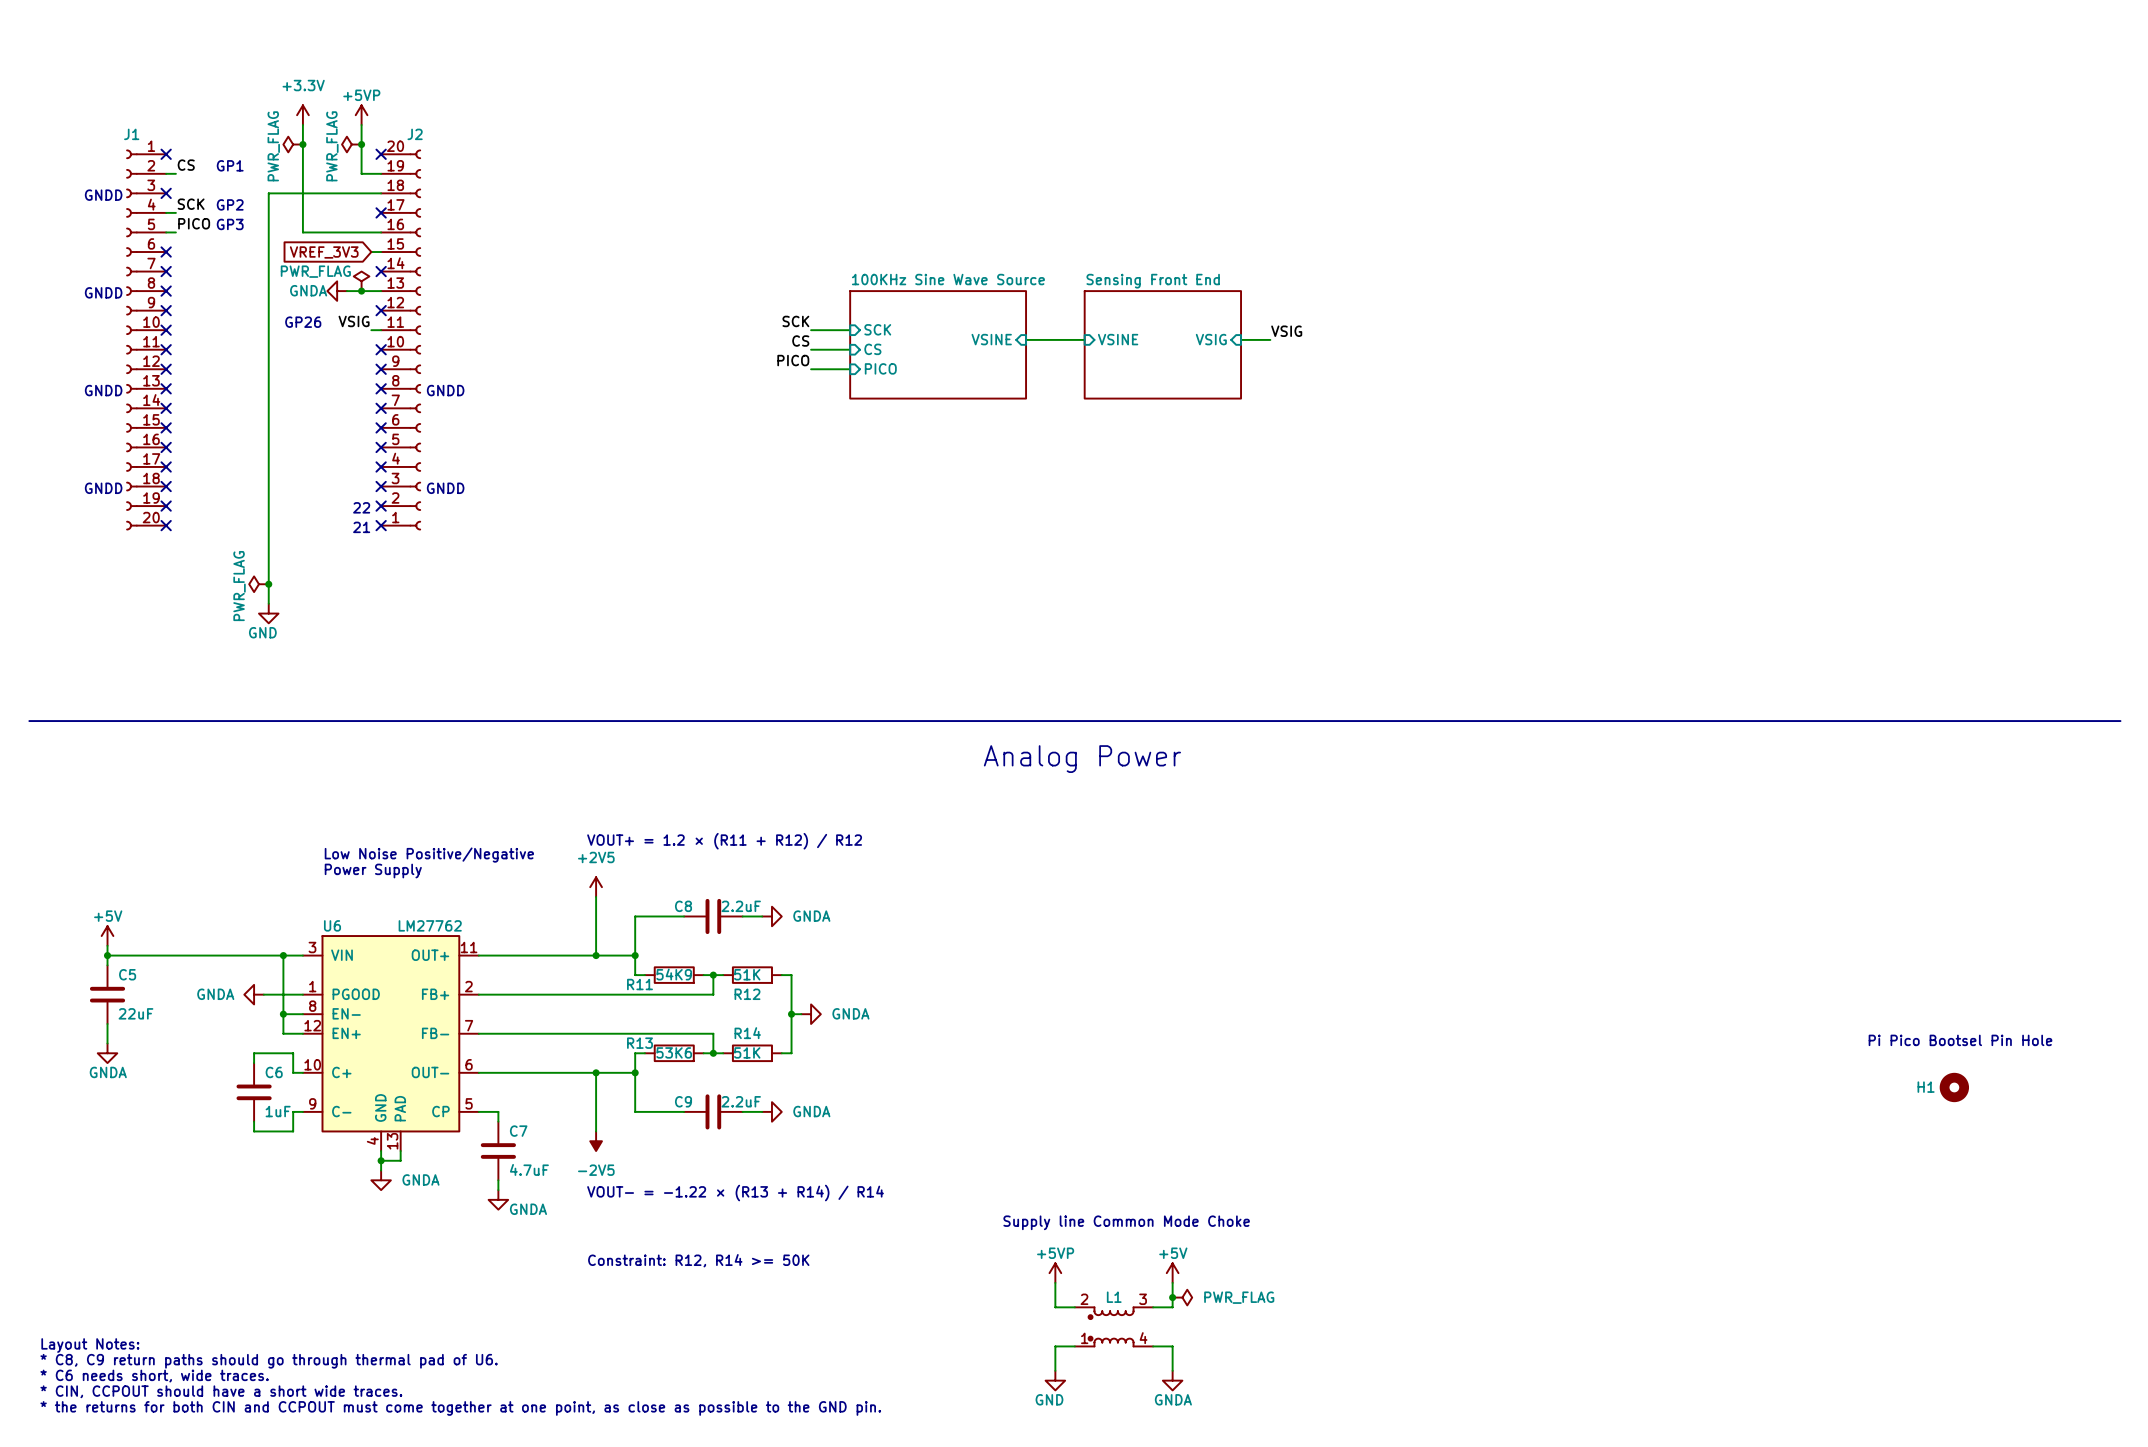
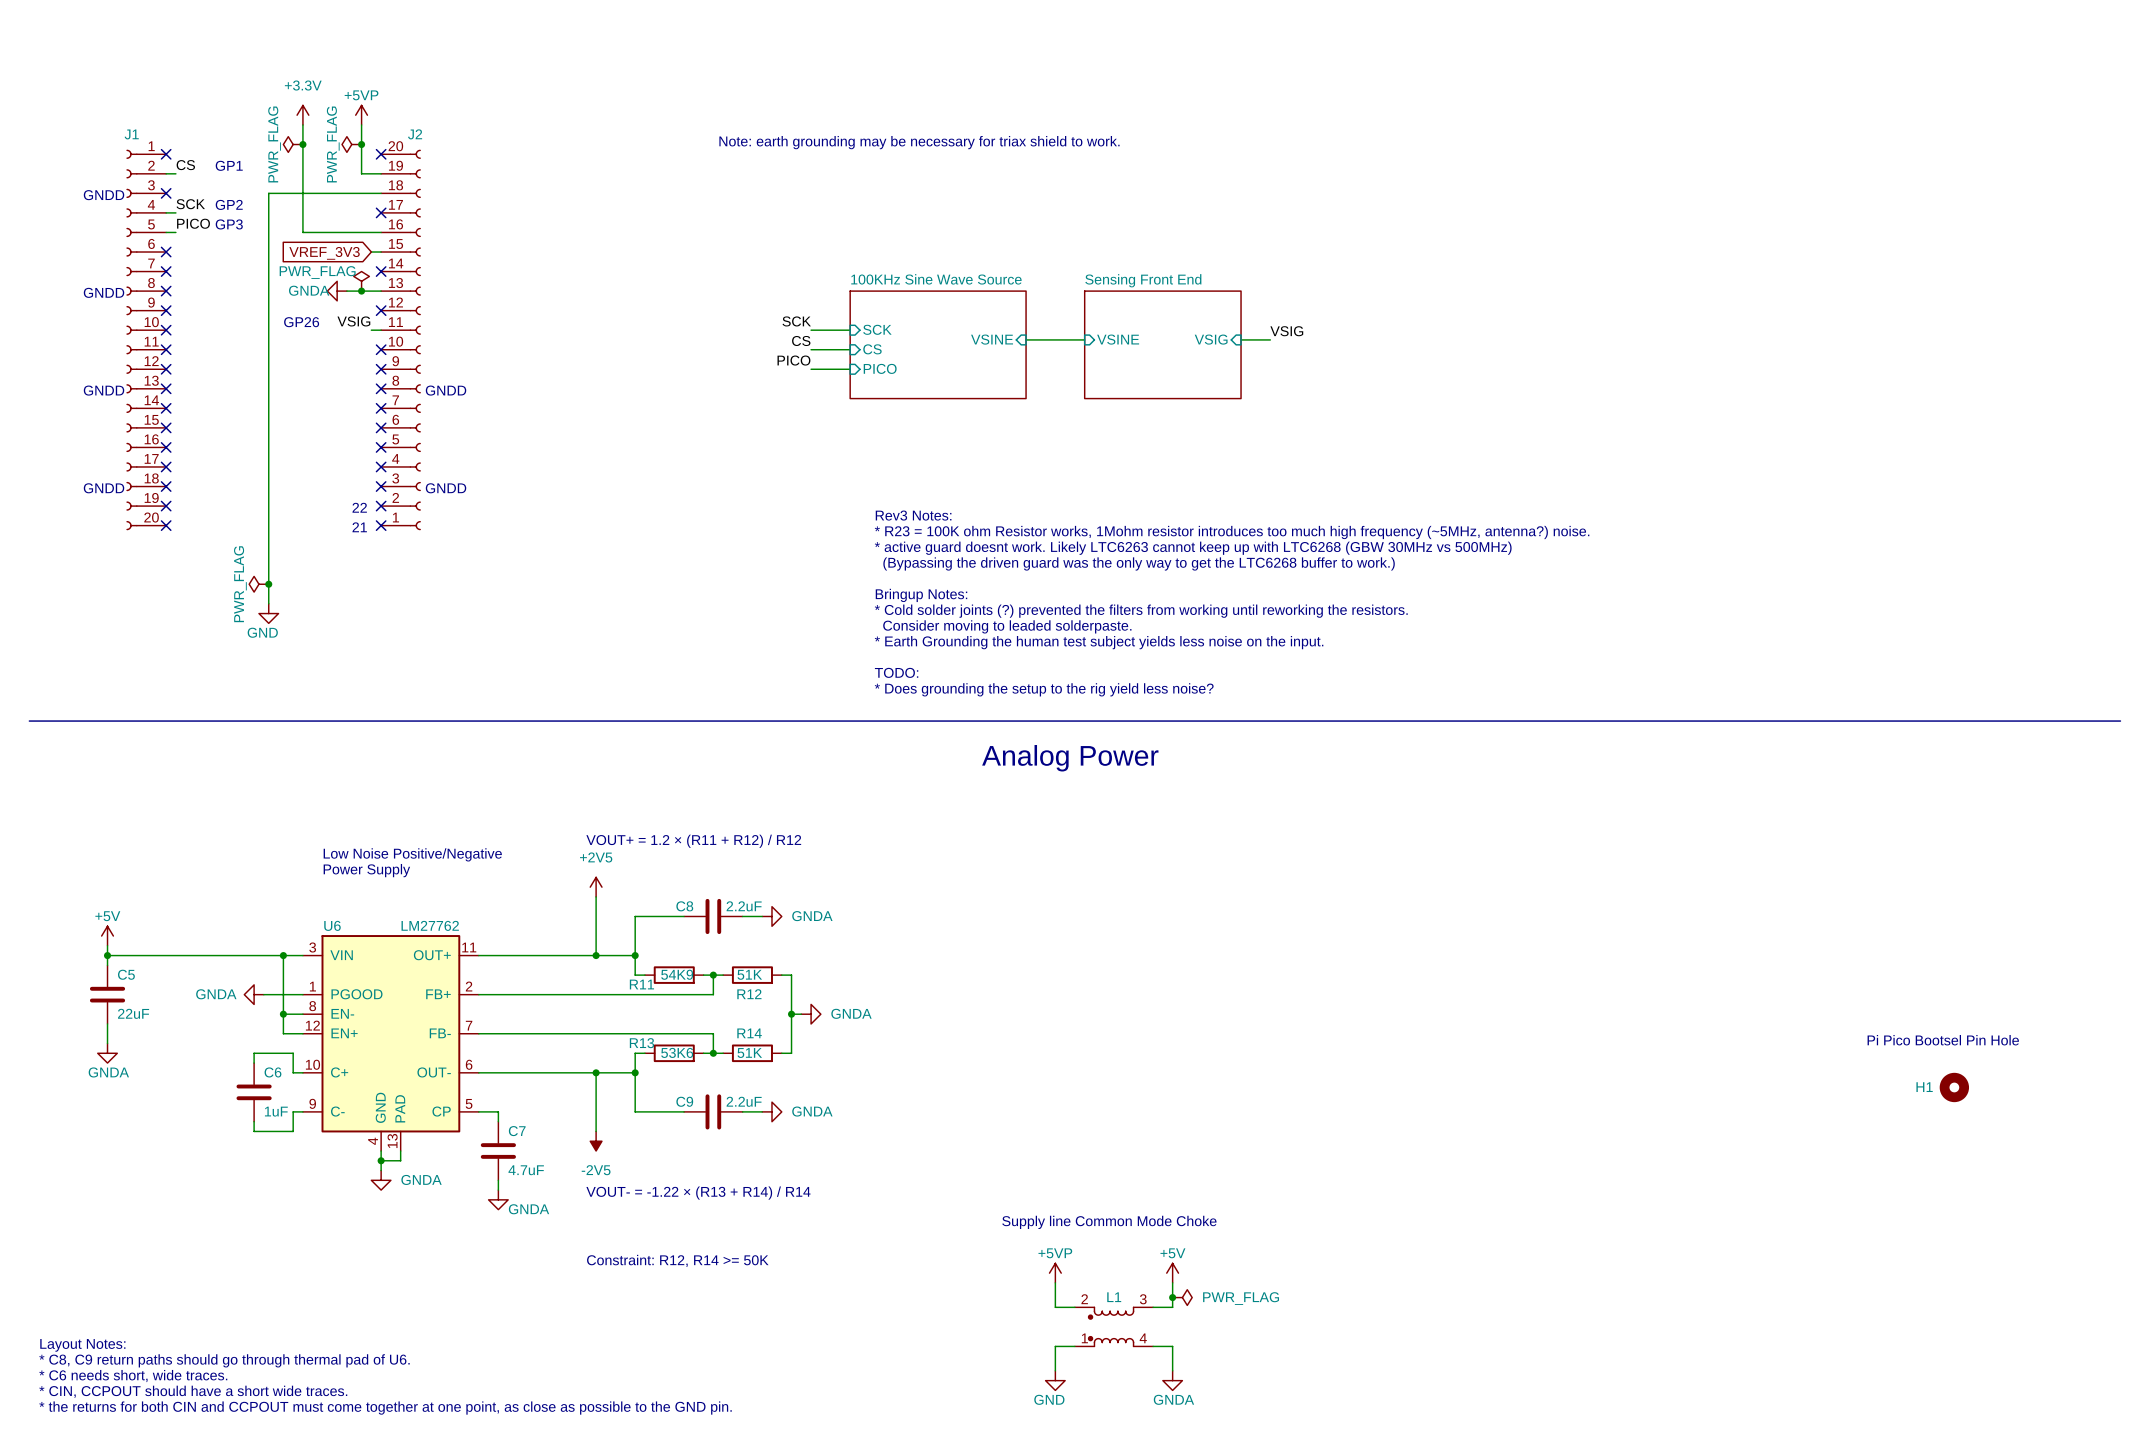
text: none -> Note: earth grounding may be necessary for triax shield to work. (919, 142)
text: none -> Rev3 Notes: (913, 515)
text: none -> * R23 = 100K ohm Resistor works, 1Mohm resistor introduces too much high frequency (~5MHz, antenna?) noise. (1232, 532)
text: none -> * active guard doesnt work. Likely LTC6263 cannot keep up with LTC6268 (GBW 30MHz vs 500MHz) (1193, 548)
text: none -> (Bypassing the driven guard was the only way to get the LTC6268 buffer to work.) (1139, 563)
text: none -> Bringup Notes: (921, 595)
text: none -> * Cold solder joints (?) prevented the filters from working until reworking the resistors. (1141, 611)
text: none -> Consider moving to leaded solderpaste. (1007, 626)
text: none -> * Earth Grounding the human test subject yields less noise on the input. (1099, 642)
text: none -> TODO: (896, 672)
text: none -> * Does grounding the setup to the rig yield less noise? (1044, 689)

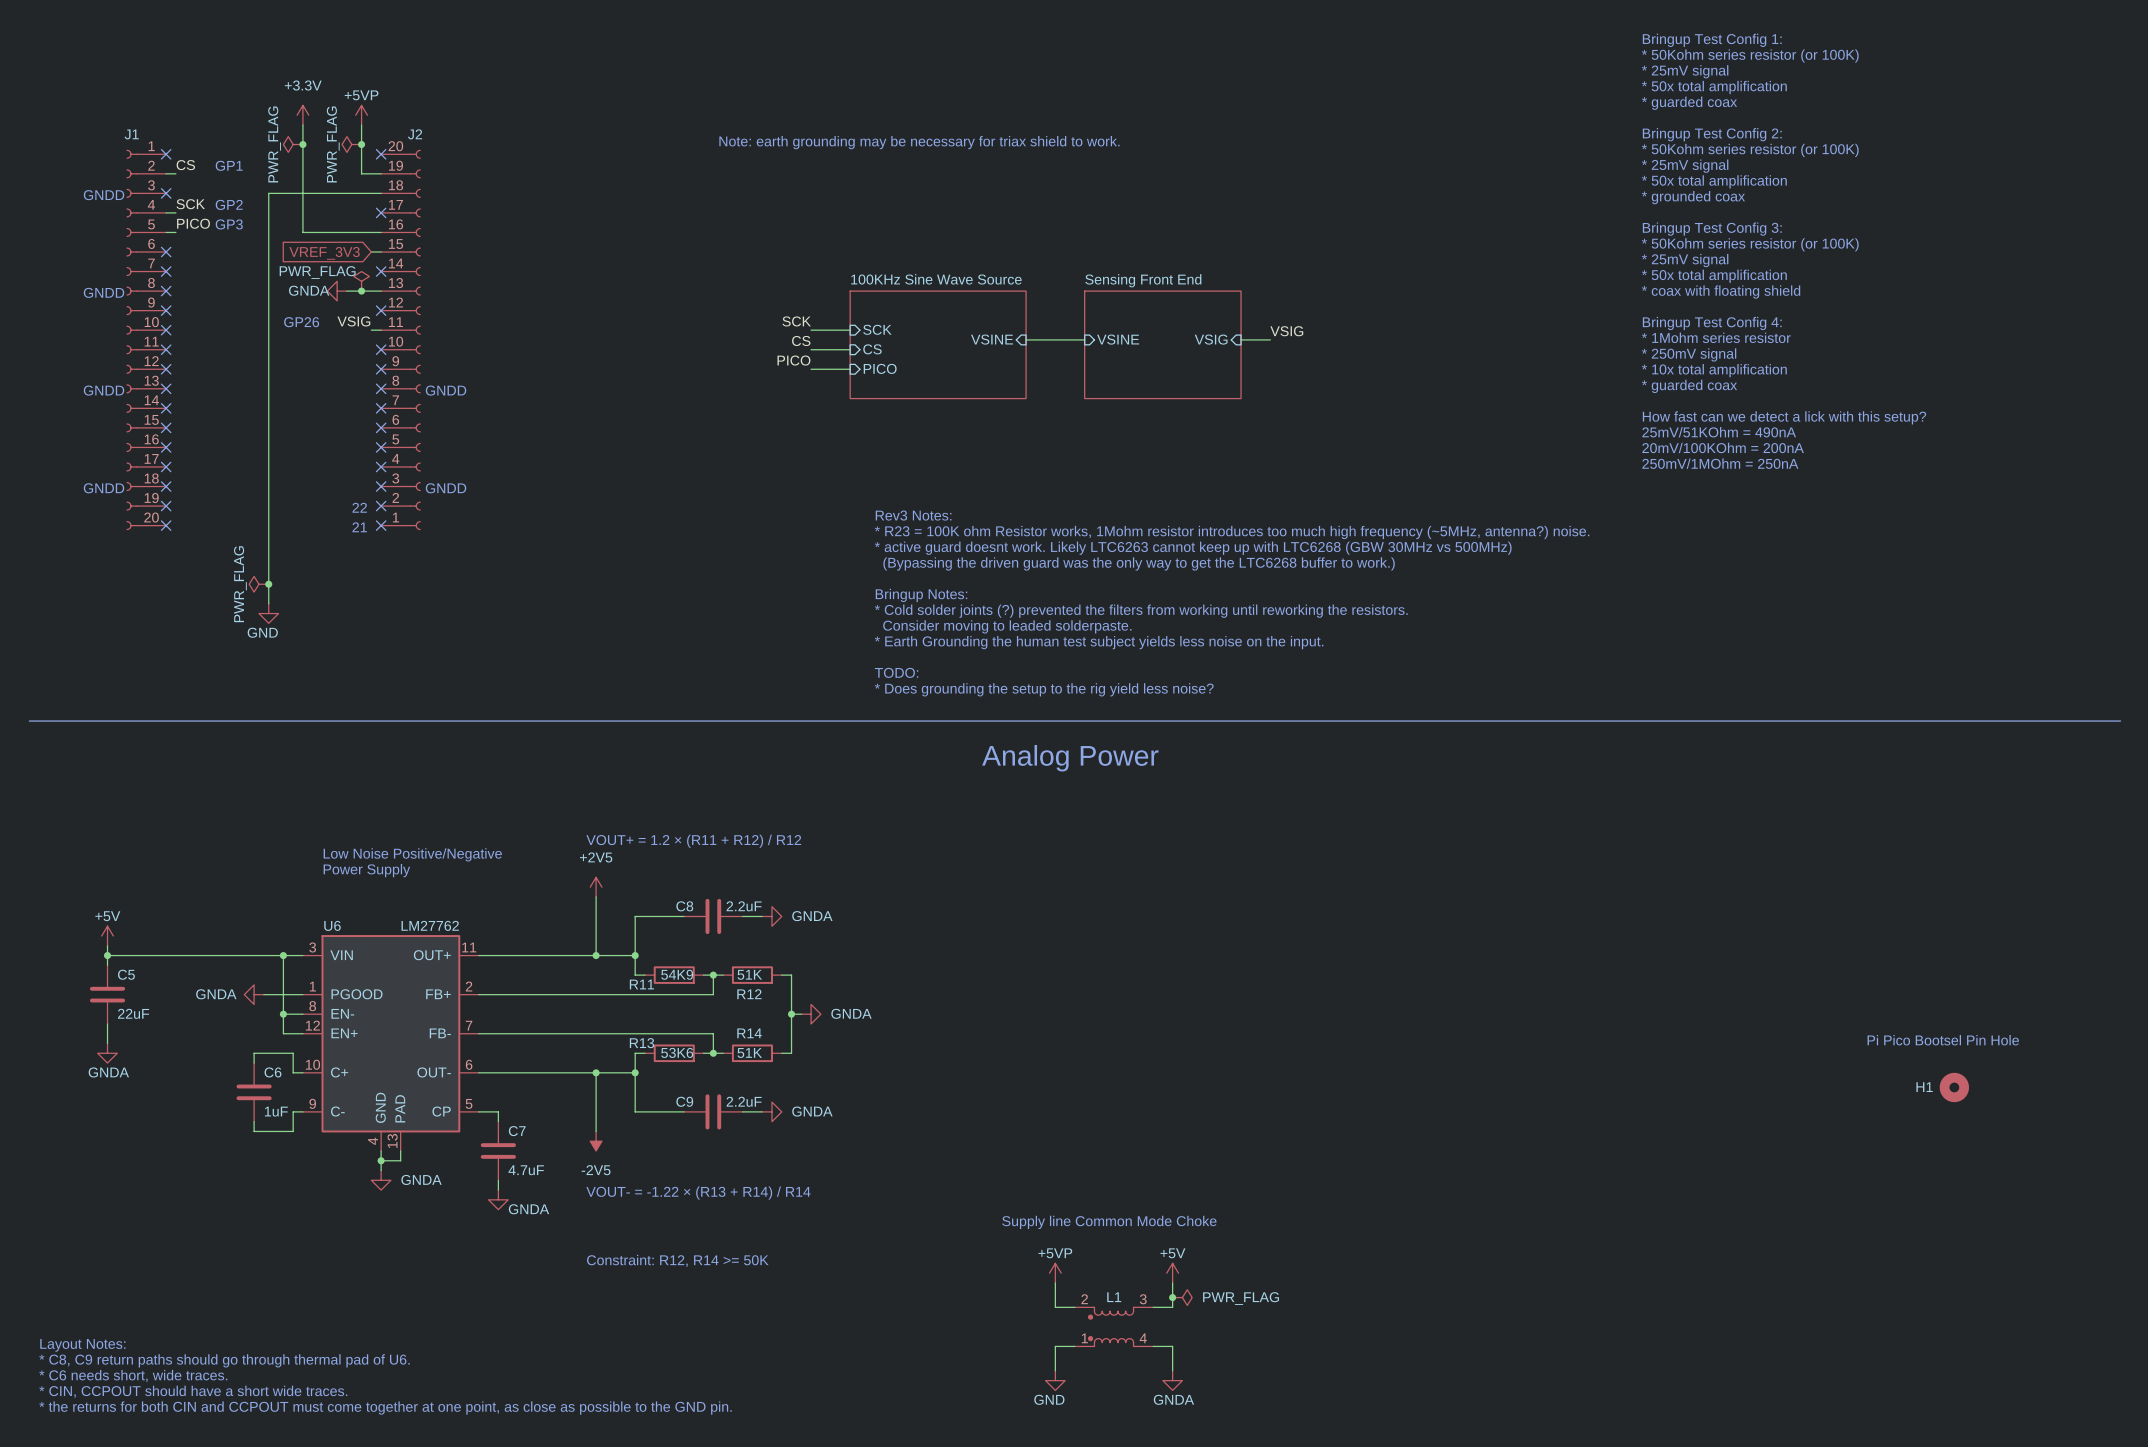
text: none -> Bringup Test Config 1: (1712, 40)
text: none -> * 50Kohm series resistor (or 100K) (1750, 56)
text: none -> * 25mV signal (1685, 71)
text: none -> * 50x total amplification (1714, 87)
text: none -> * guarded coax (1689, 103)
text: none -> Bringup Test Config 2: (1712, 134)
text: none -> * 50Kohm series resistor (or 100K) (1750, 150)
text: none -> * 25mV signal (1685, 166)
text: none -> * 50x total amplification (1714, 181)
text: none -> * grounded coax (1693, 197)
text: none -> Bringup Test Config 3: (1712, 229)
text: none -> * 50Kohm series resistor (or 100K) (1750, 244)
text: none -> * 25mV signal (1685, 260)
text: none -> * 50x total amplification (1714, 276)
text: none -> * coax with floating shield (1721, 292)
text: none -> Bringup Test Config 4: (1712, 323)
text: none -> * 1Mohm series resistor (1716, 337)
text: none -> * 250mV signal (1689, 354)
text: none -> * 10x total amplification (1714, 370)
text: none -> * guarded coax (1689, 386)
text: none -> How fast can we detect a lick with this setup? (1784, 417)
text: none -> 25mV/51KOhm = 490nA (1719, 432)
text: none -> 20mV/100KOhm = 200nA (1723, 447)
text: none -> 250mV/1MOhm = 250nA (1720, 463)

